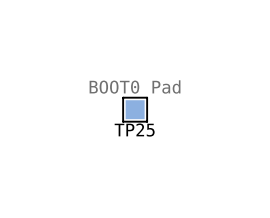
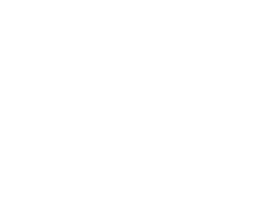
TP25: BOOT0 Pad (135, 109) -> none

